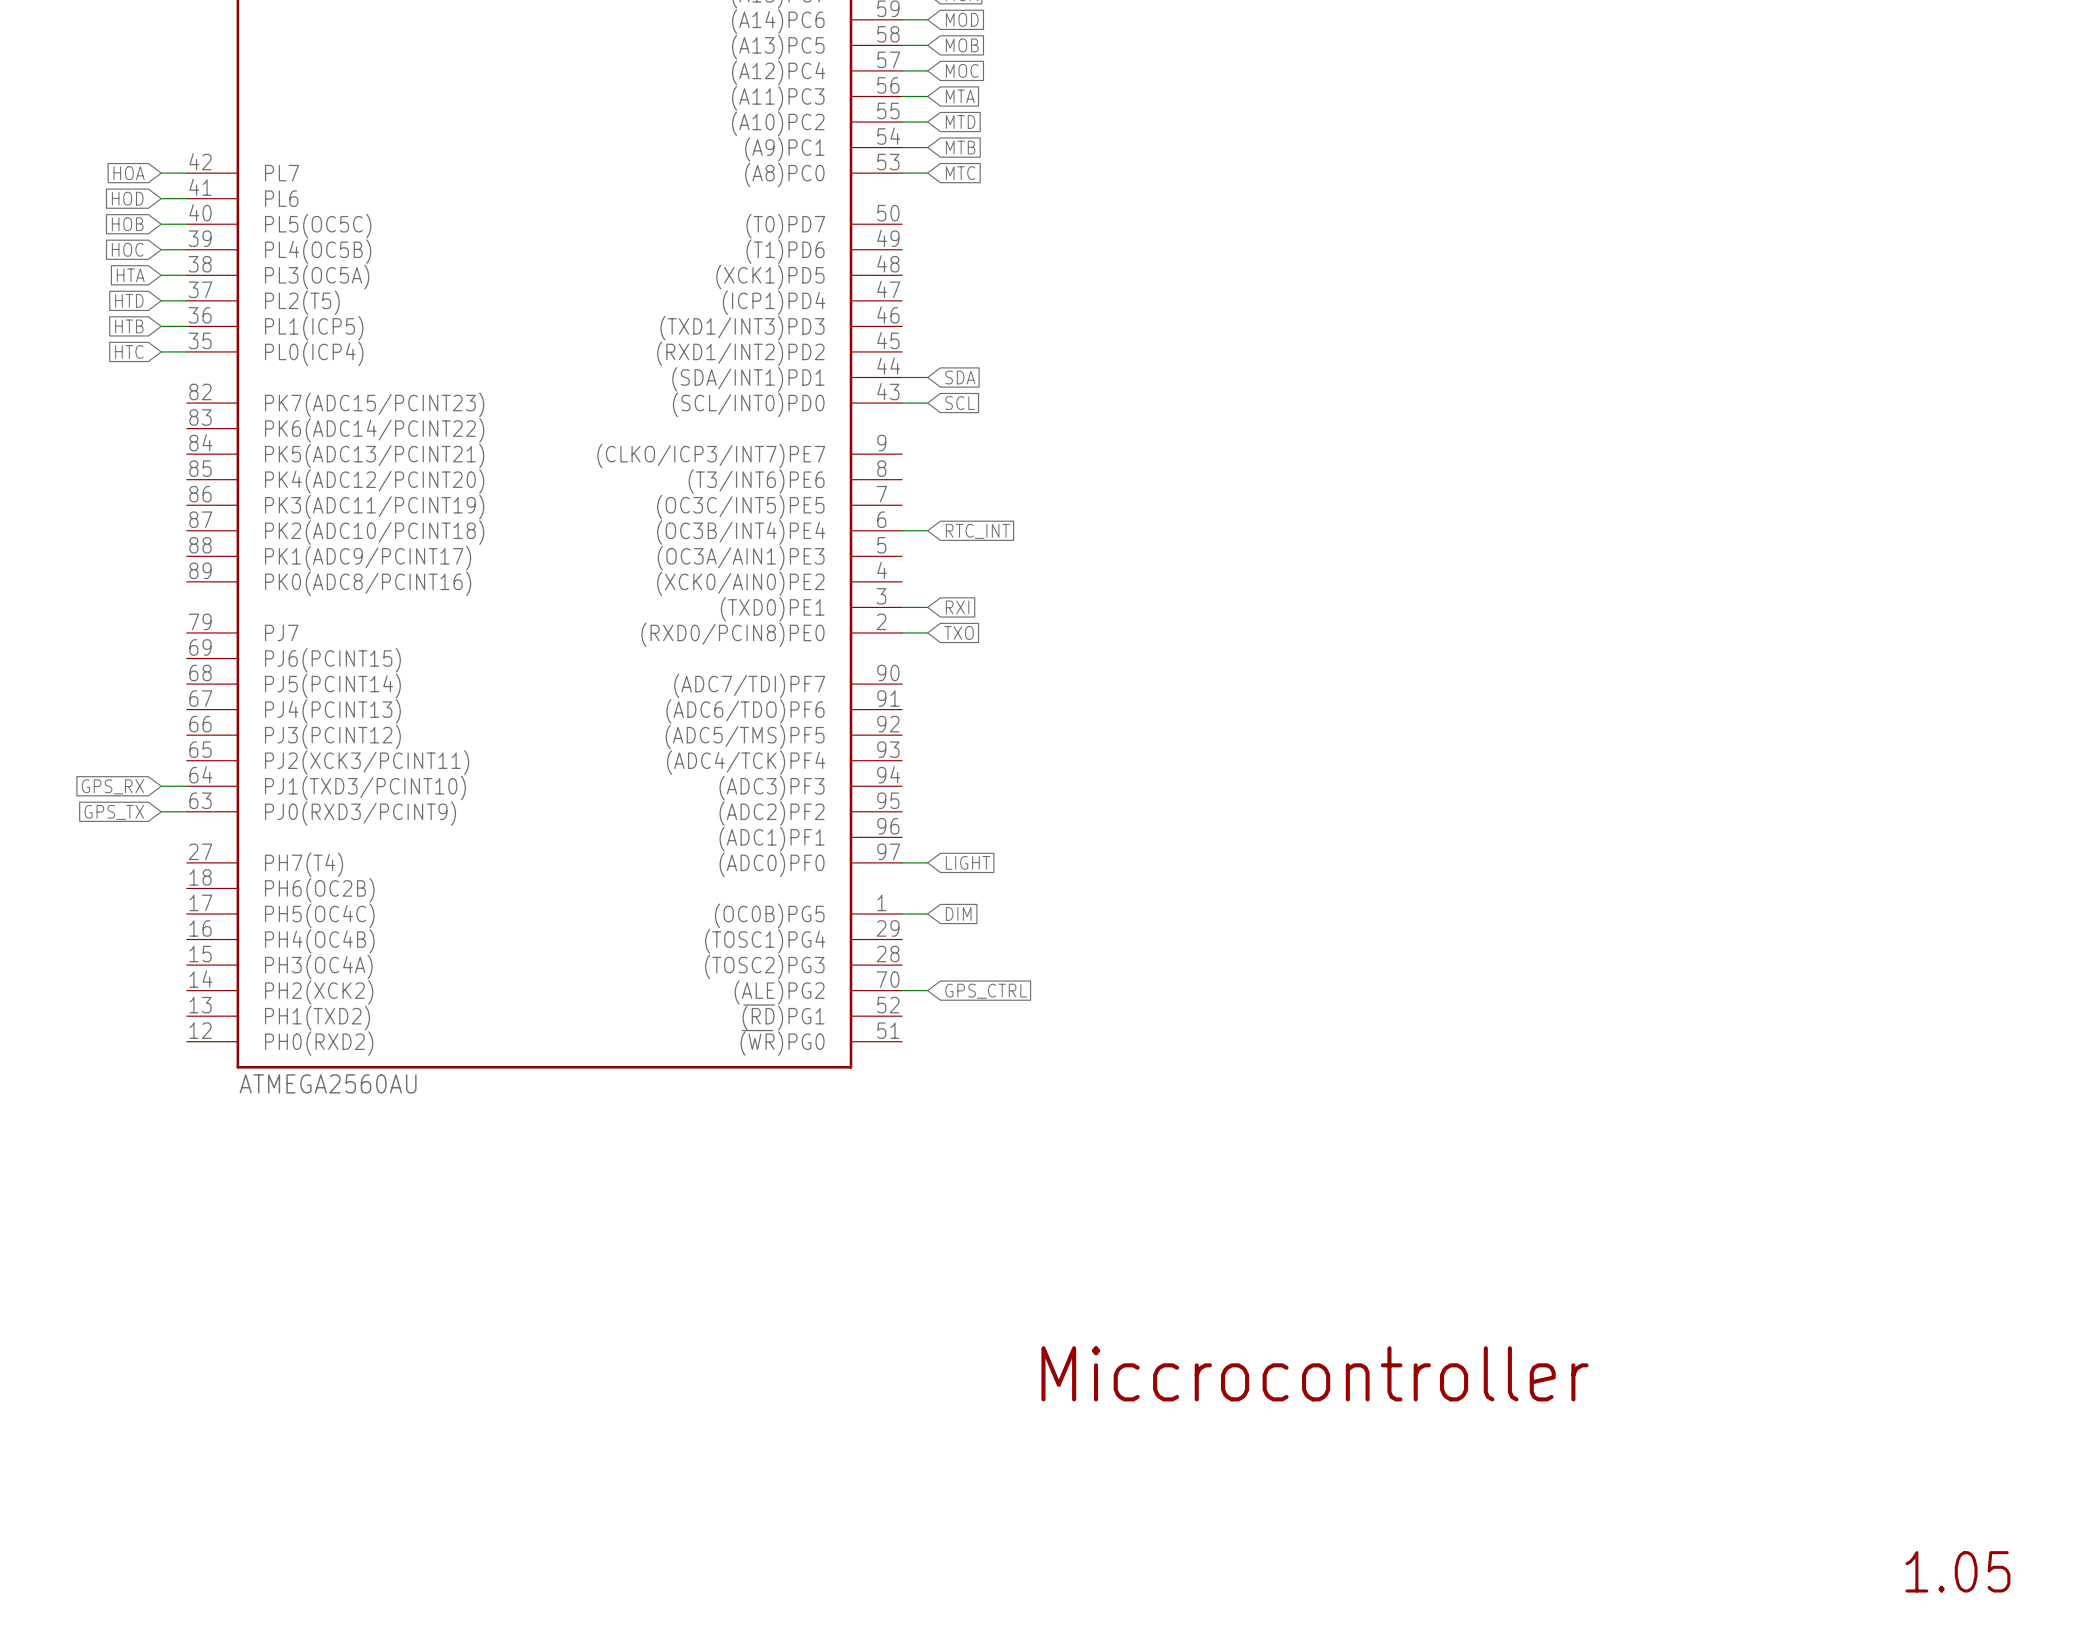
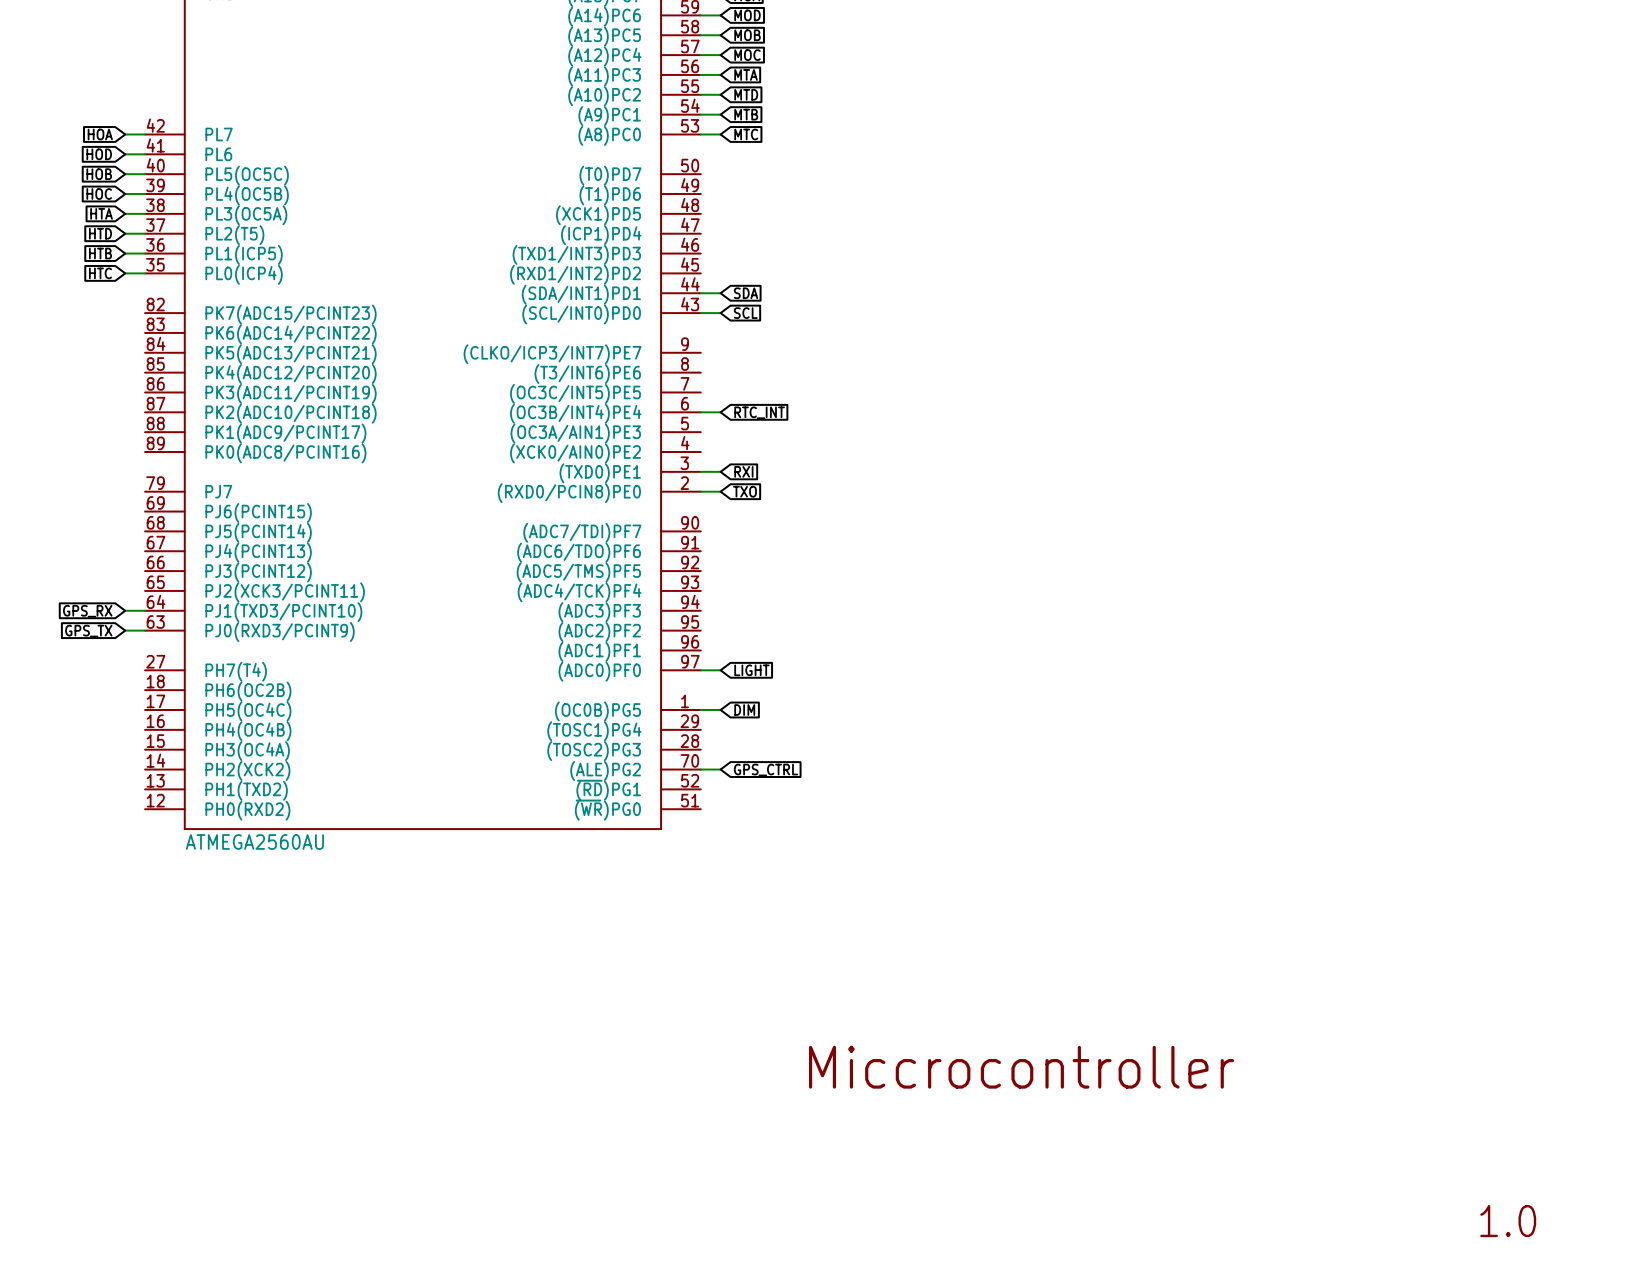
text: 1.05 (1957, 1571) -> 1.0 (1508, 1221)

